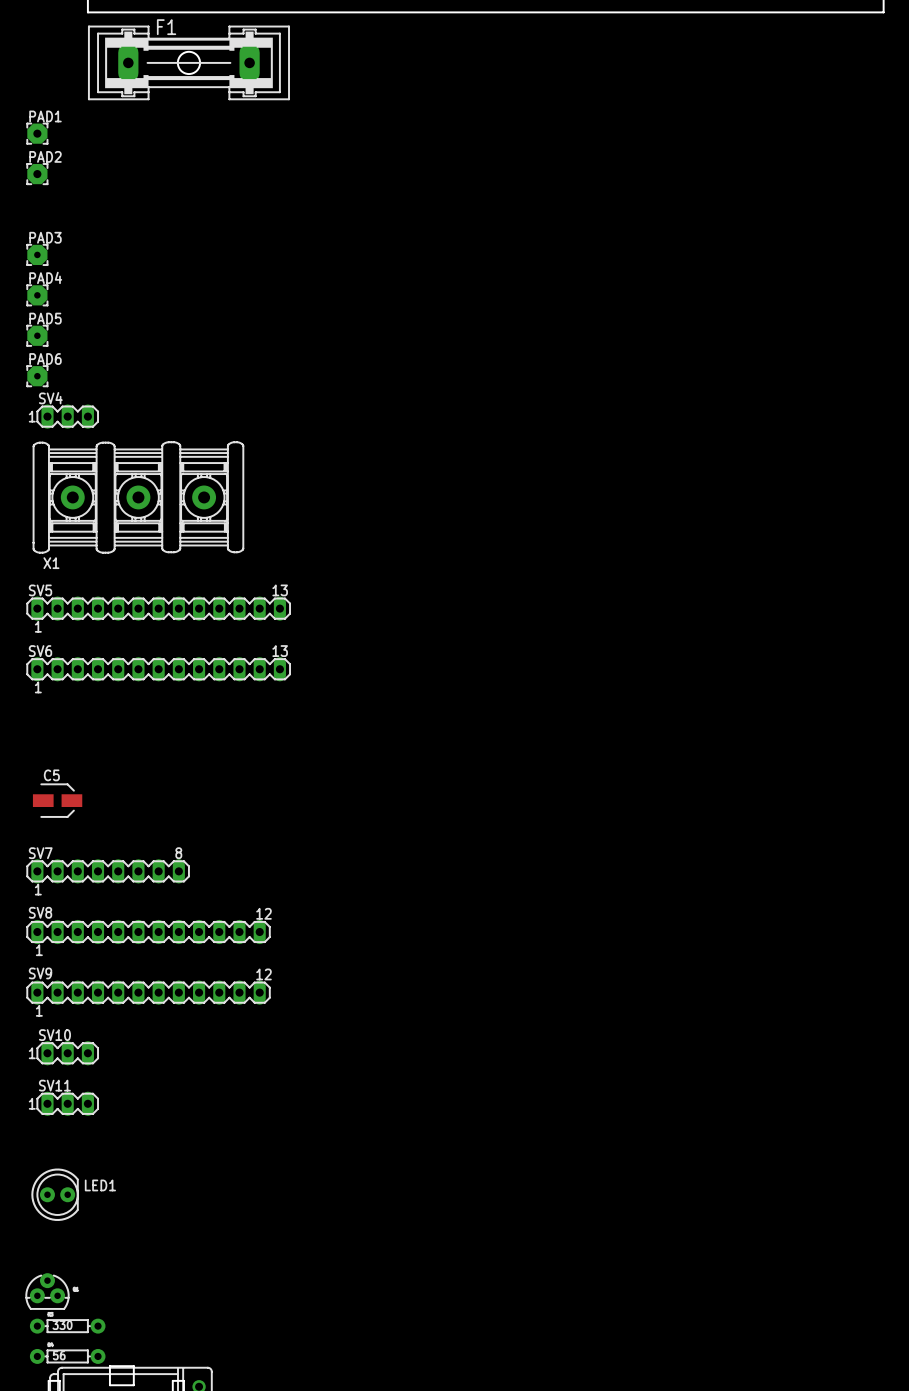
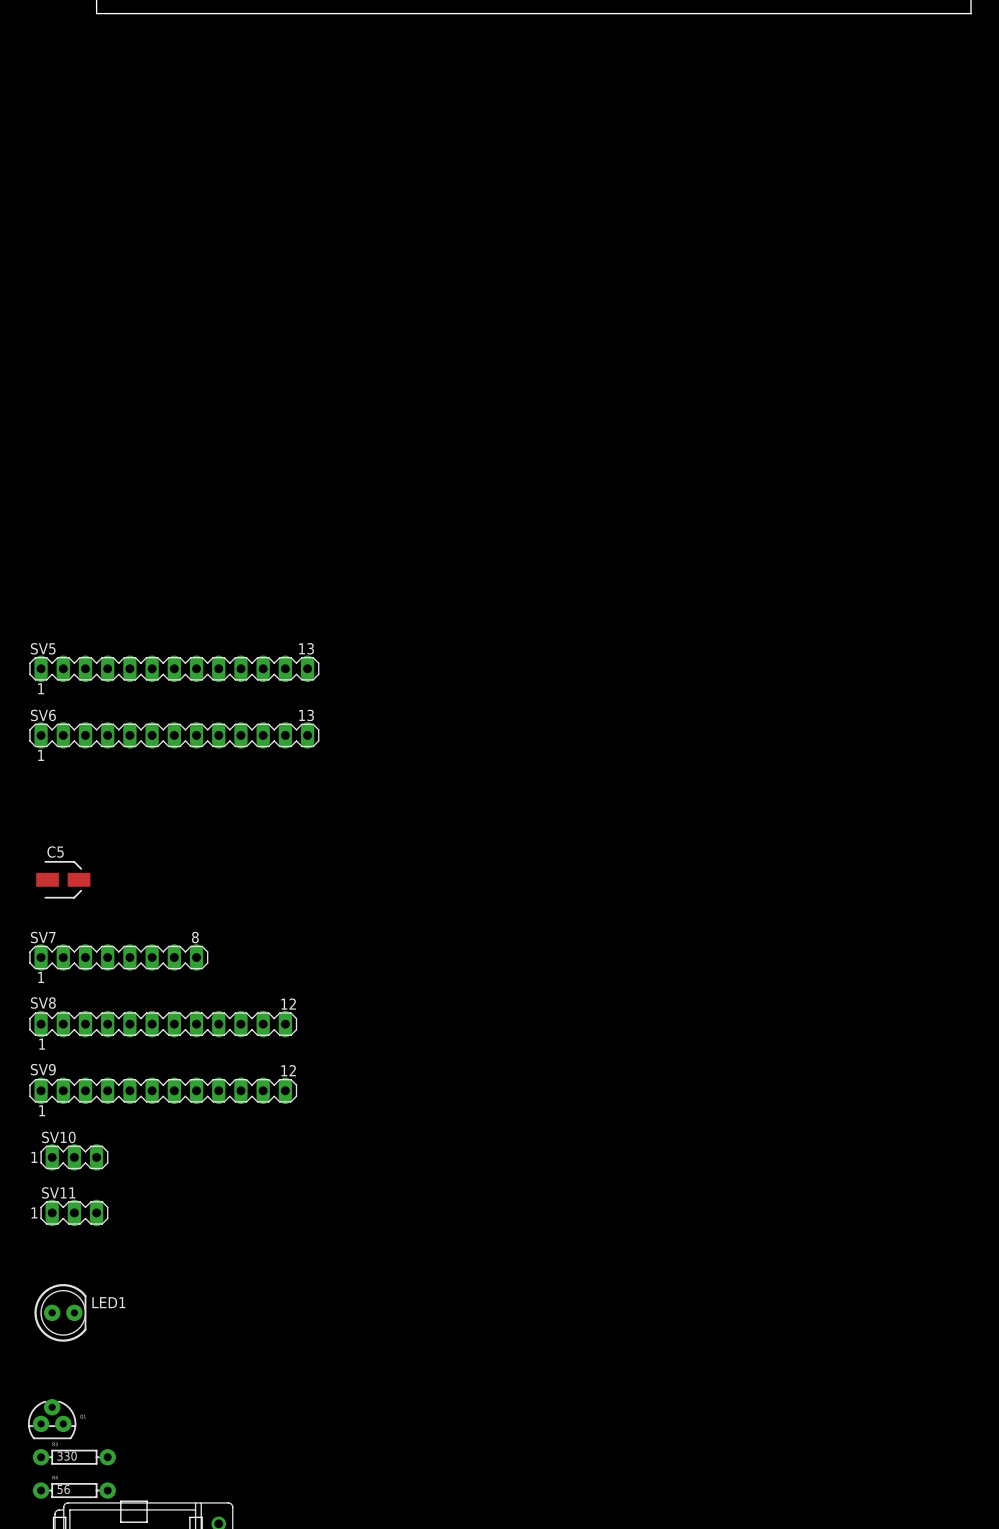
F1: (188, 62) -> none
PAD1: (37, 133) -> none
PAD2: (37, 174) -> none
PAD3: (37, 254) -> none
PAD4: (37, 295) -> none
PAD5: (37, 335) -> none
PAD6: (37, 376) -> none
SV4: (67, 416) -> none
X1: (138, 497) -> none

